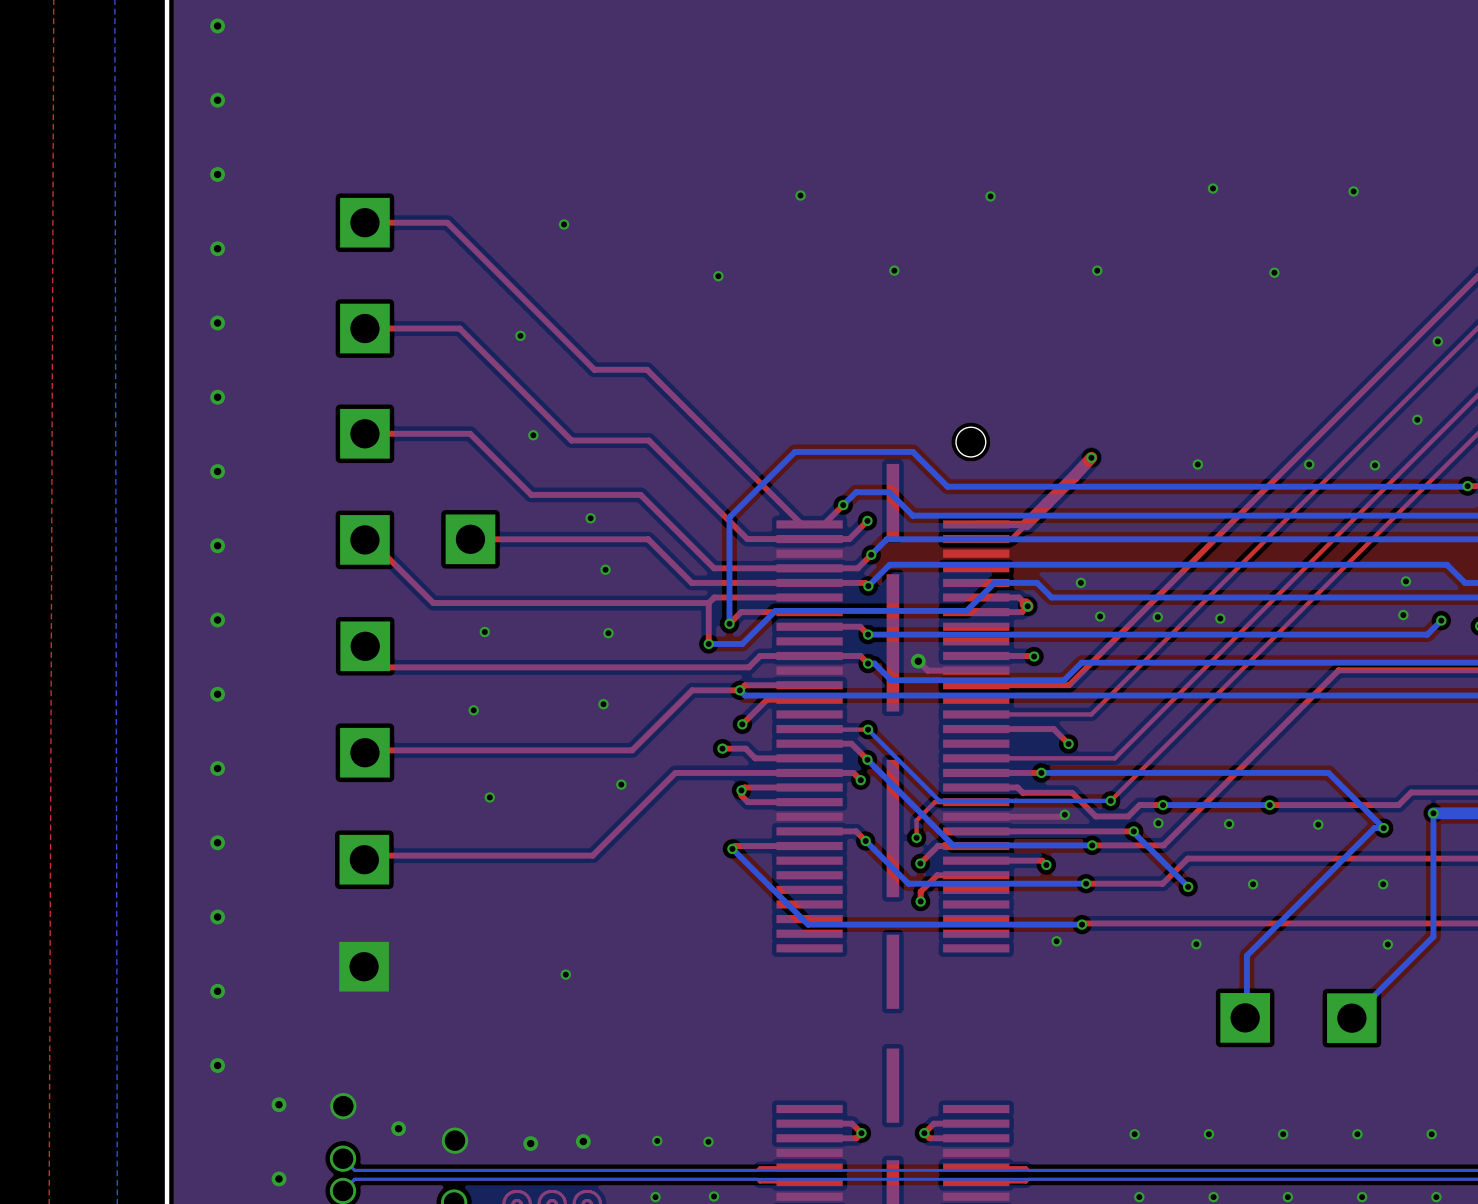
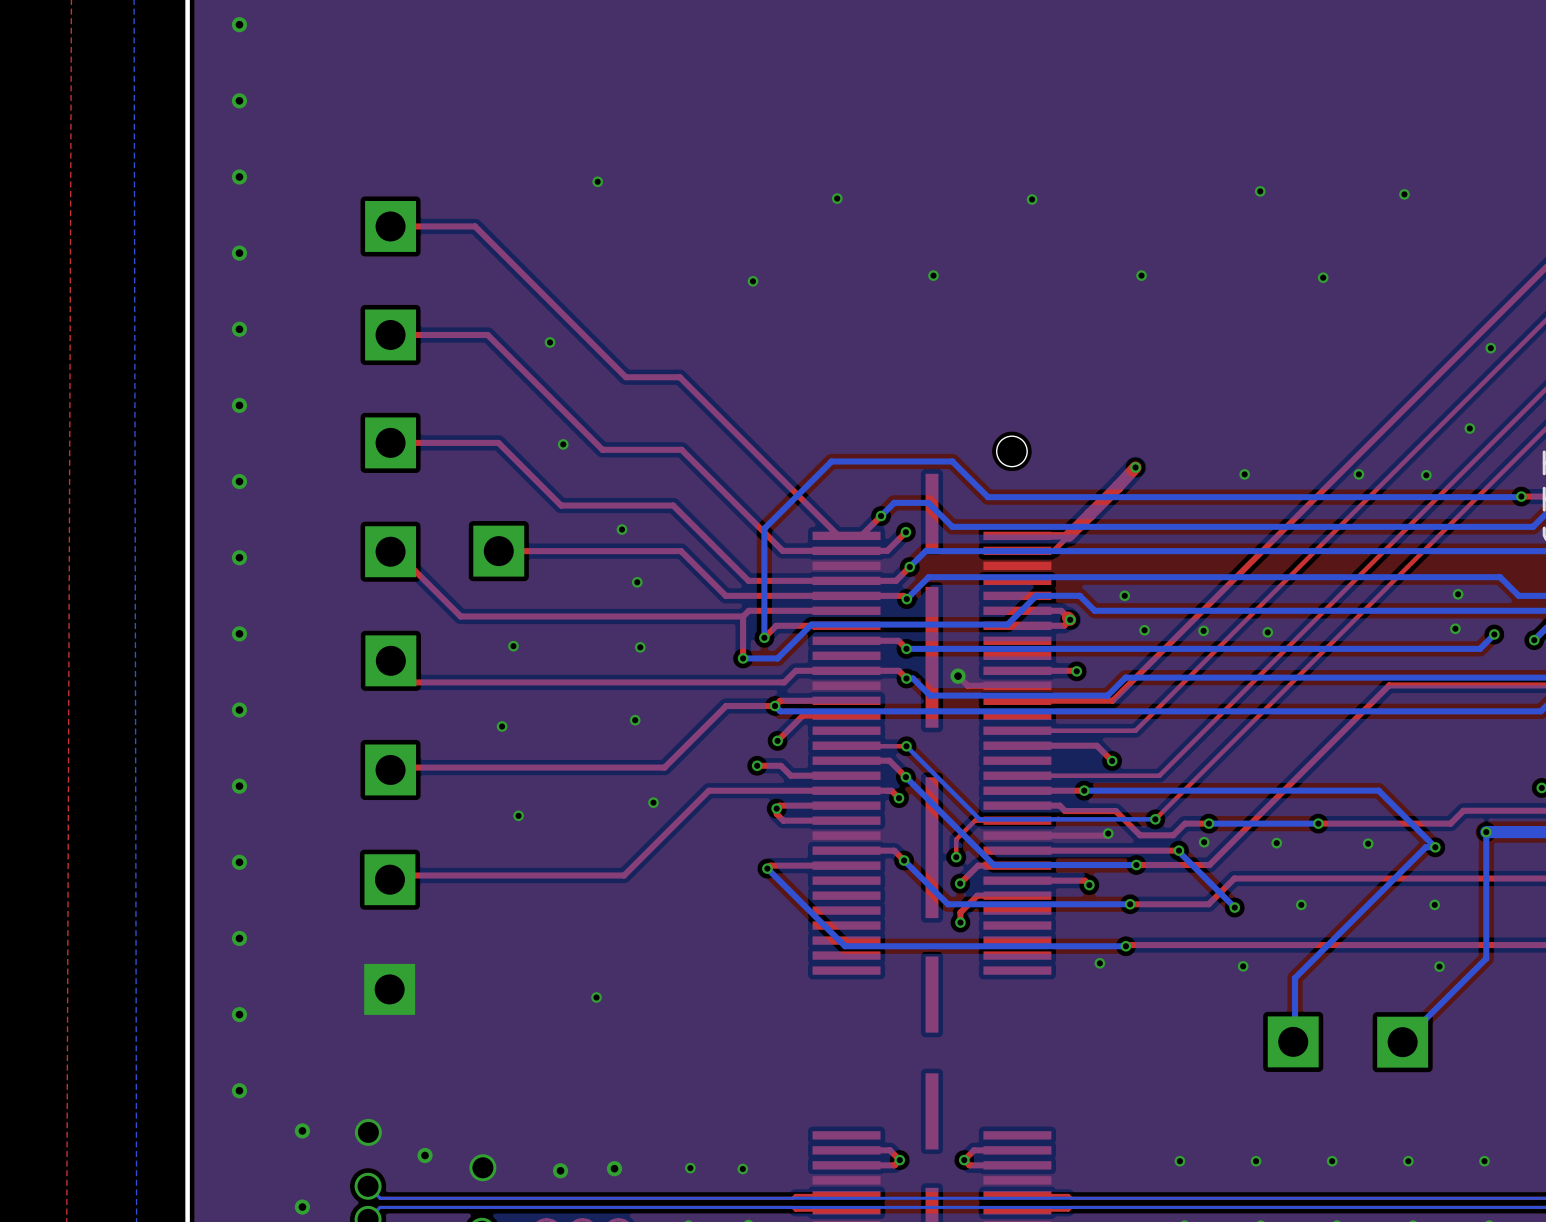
via position: (564, 224) -> (597, 181)

